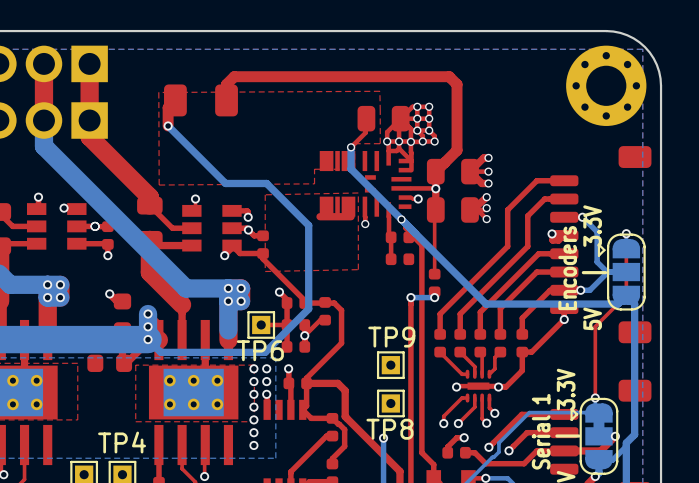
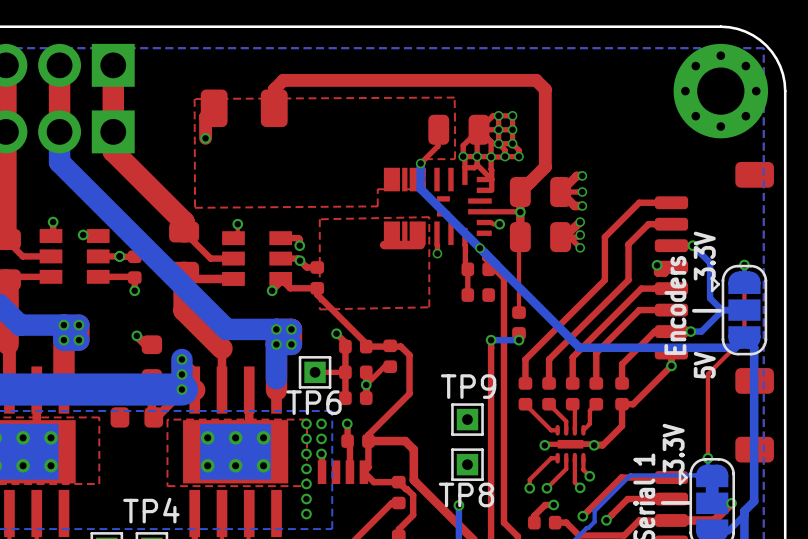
bottom track: (168, 125) (225, 183) (266, 183) (308, 225) (308, 308) (265, 352) (160, 352) (148, 339) -> none

